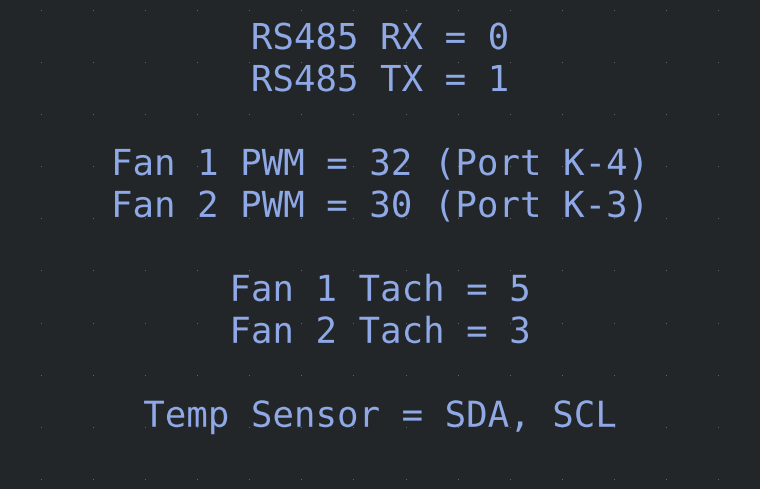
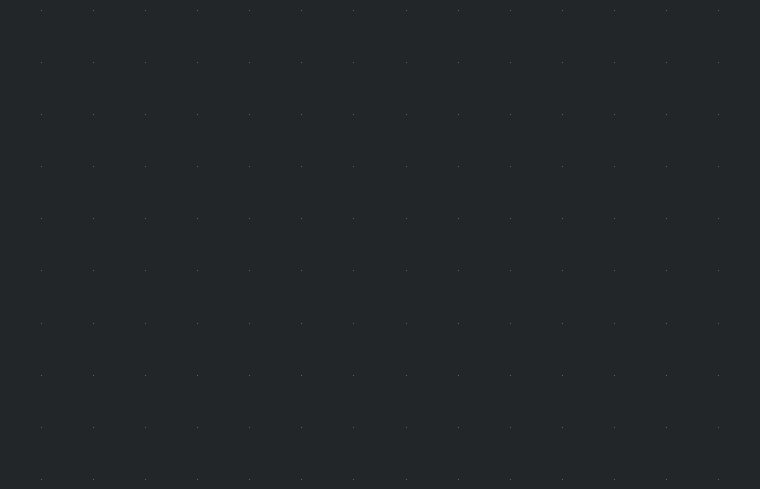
text: RS485 RX = 0 (380, 36) -> none
text: RS485 TX = 1 (380, 78) -> none
text: Fan 1 PWM = 32 (Port K-4) (378, 163) -> none
text: Fan 2 PWM = 30 (Port K-3) (378, 205) -> none
text: Fan 1 Tach = 5 (380, 287) -> none
text: Fan 2 Tach = 3 (380, 329) -> none
text: Temp Sensor = SDA, SCL (379, 417) -> none

